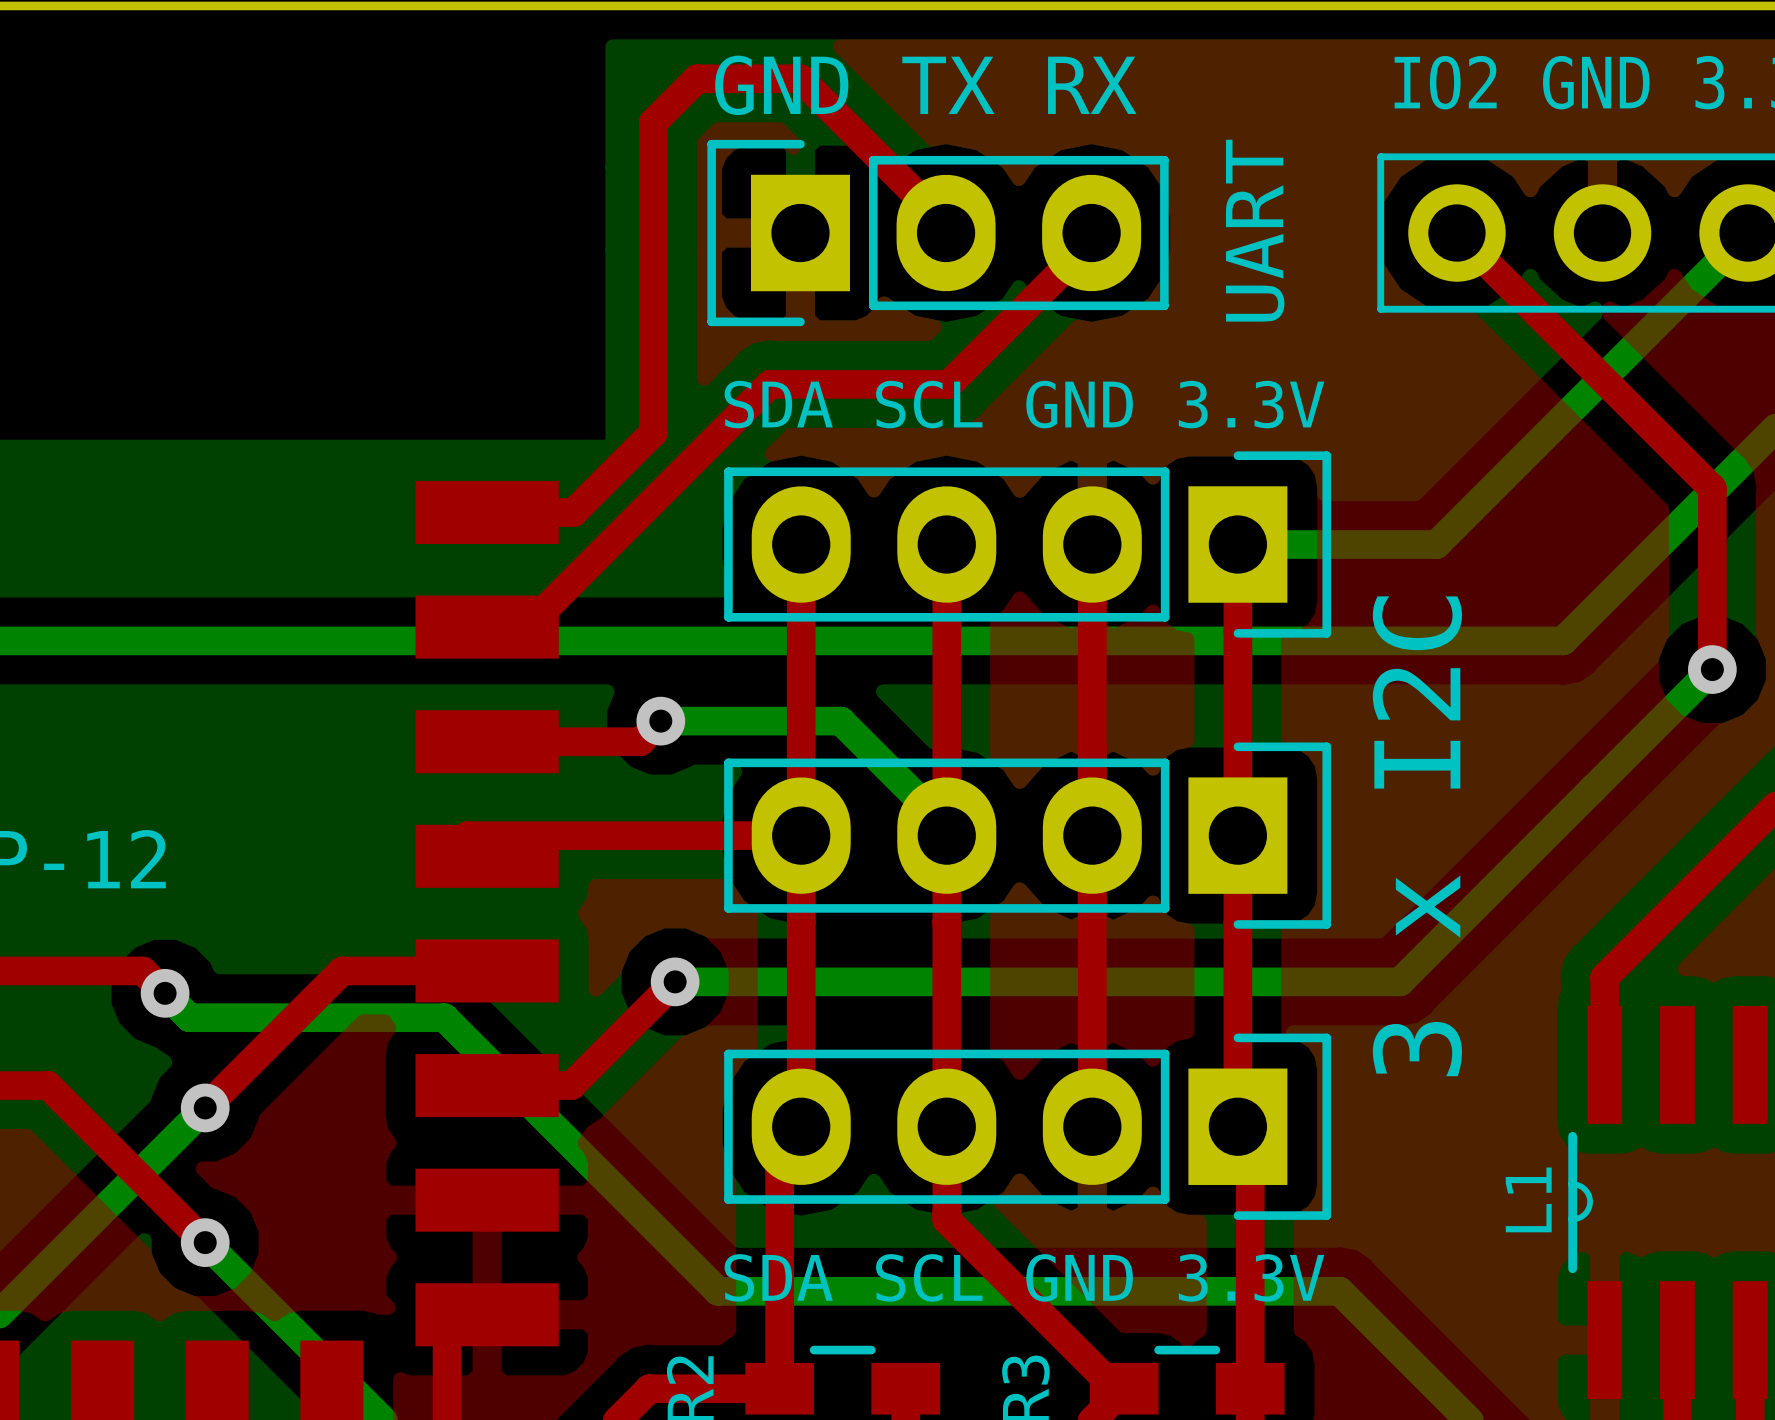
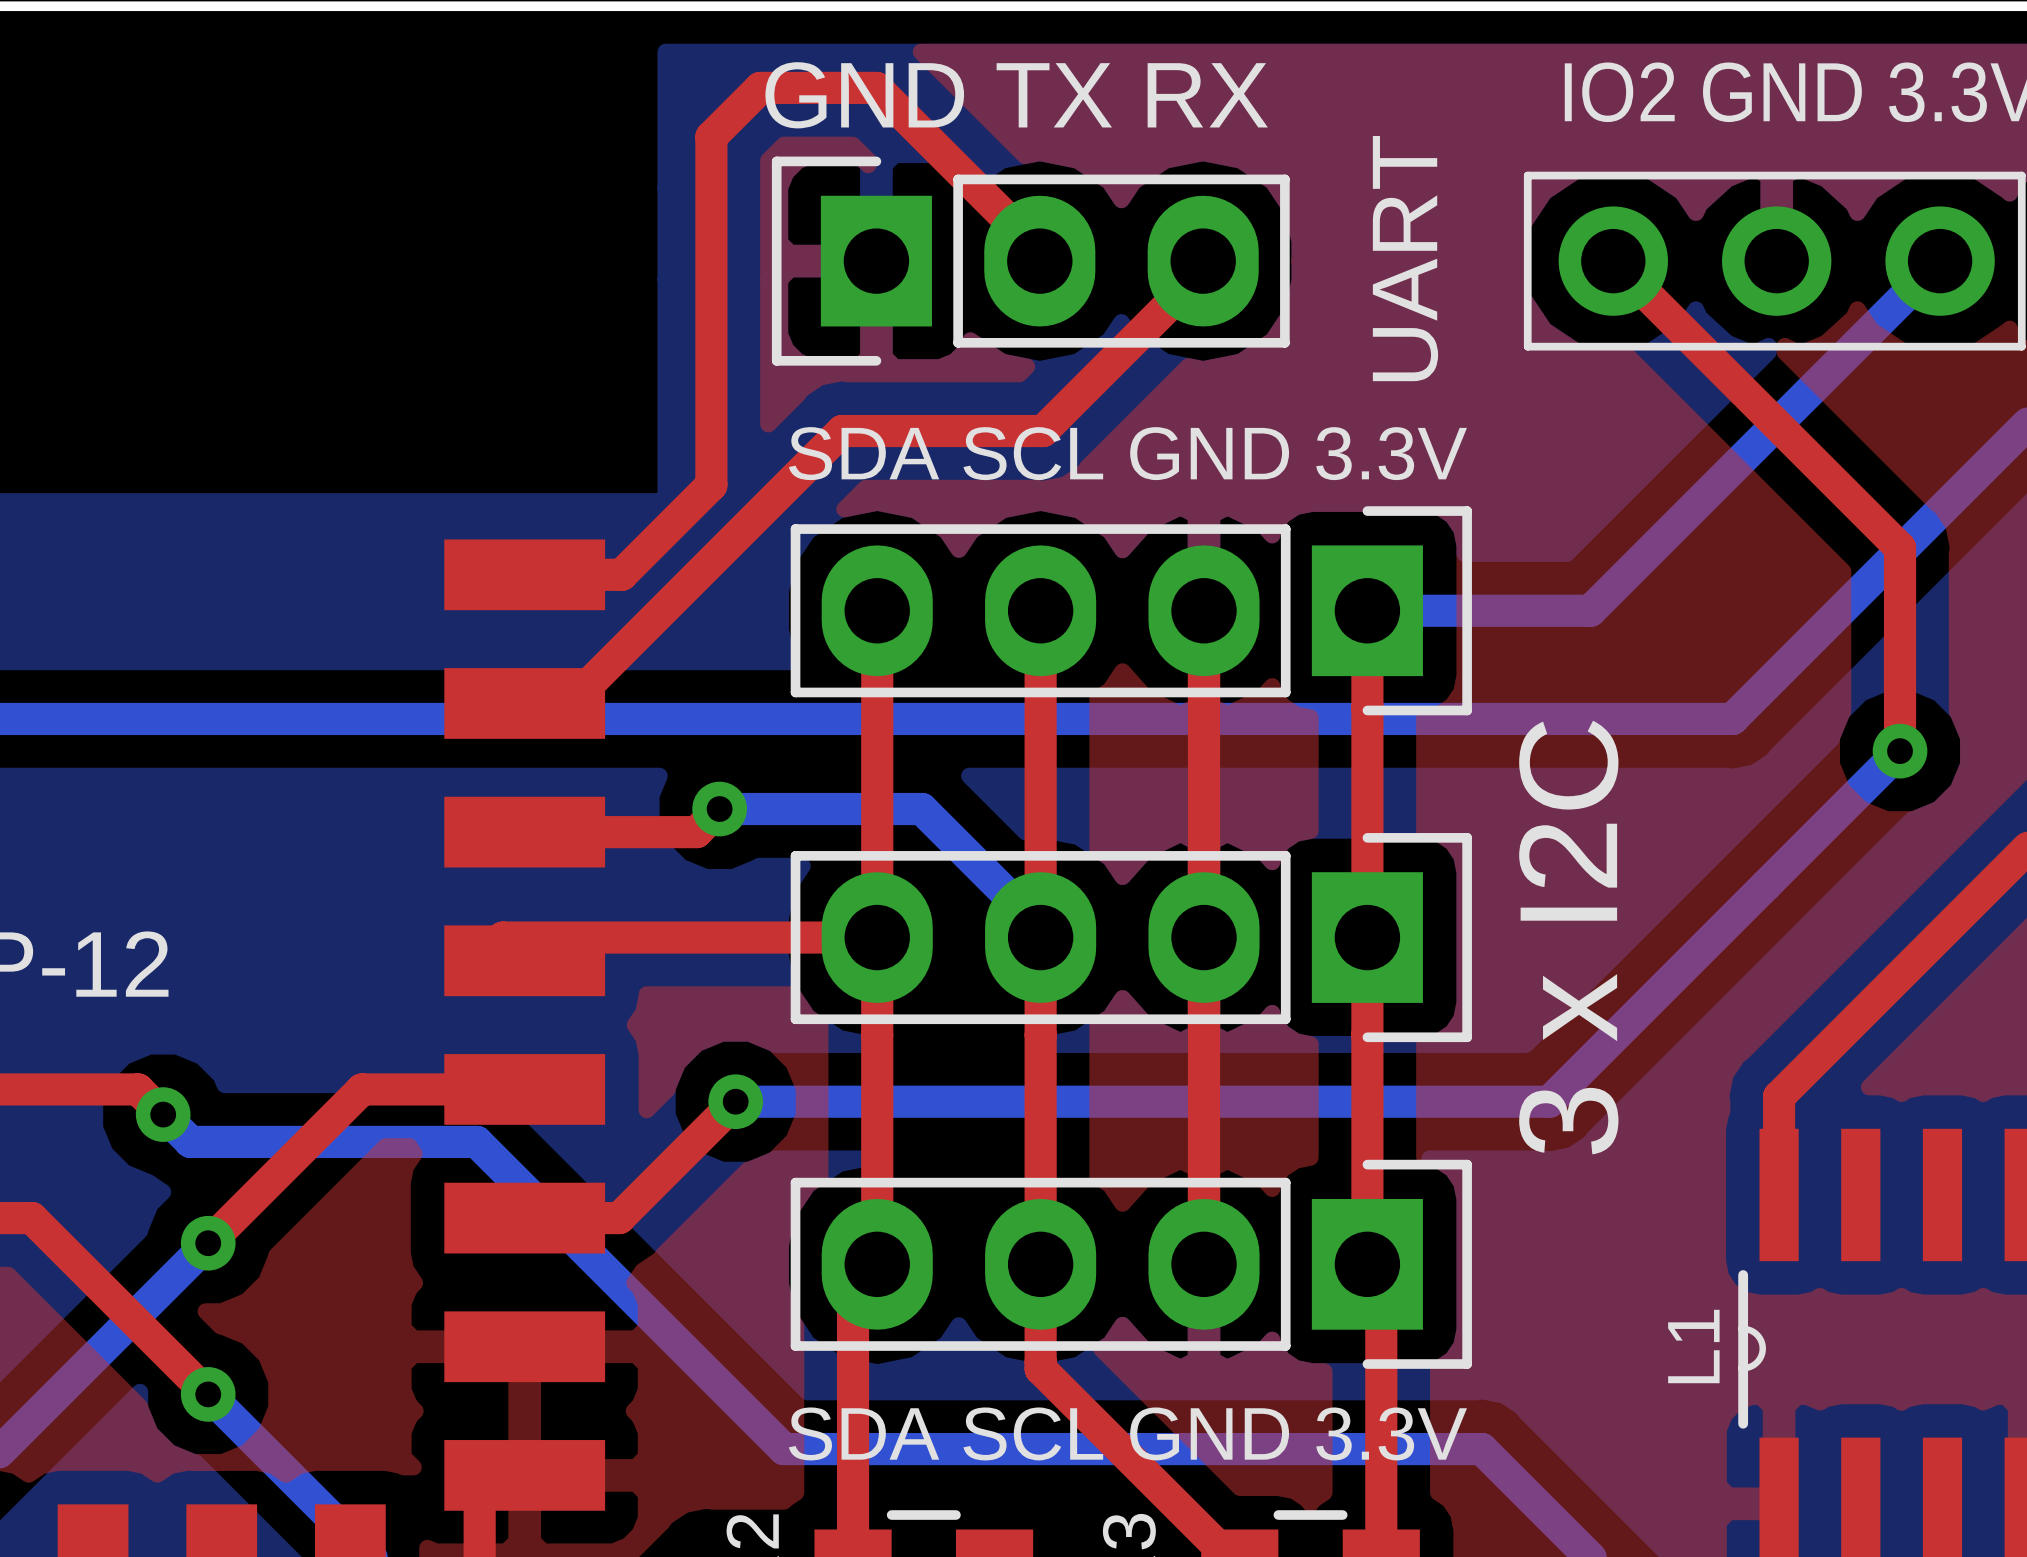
text position: UART (1255, 230) -> UART (1405, 258)

